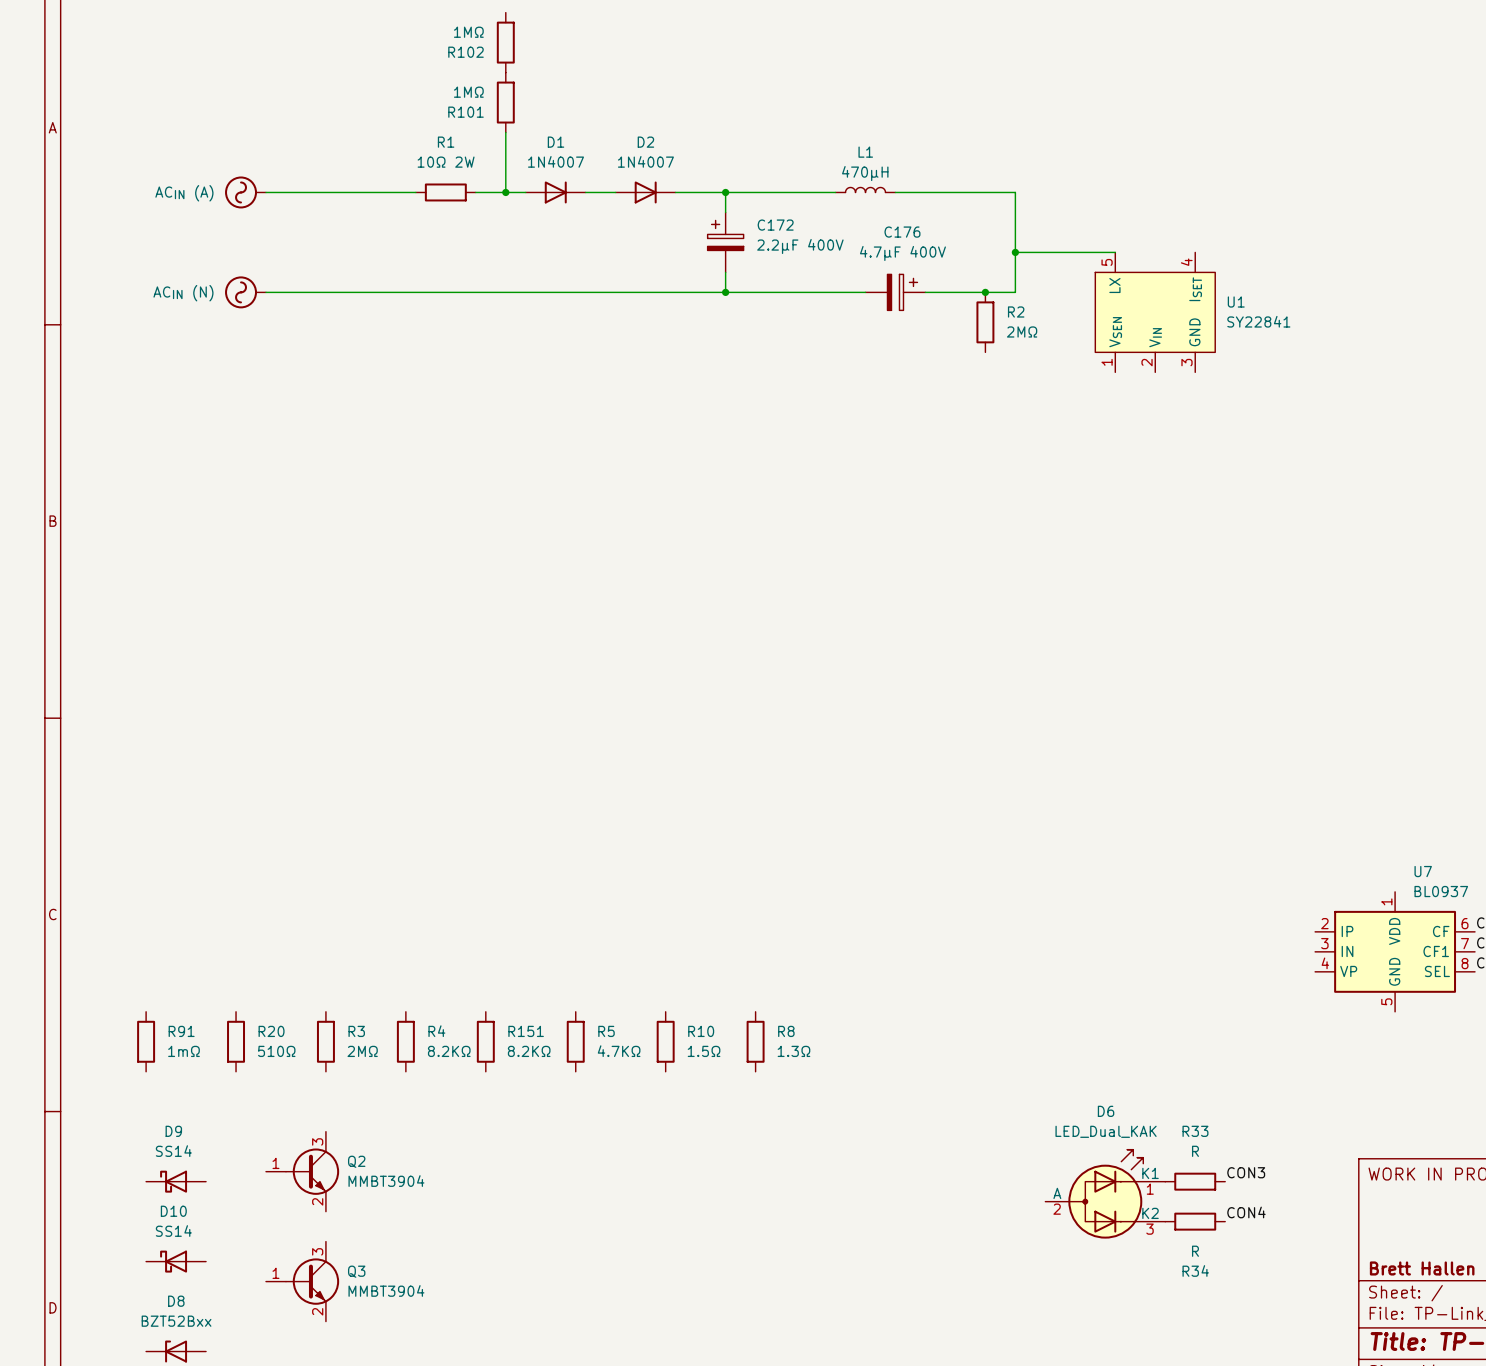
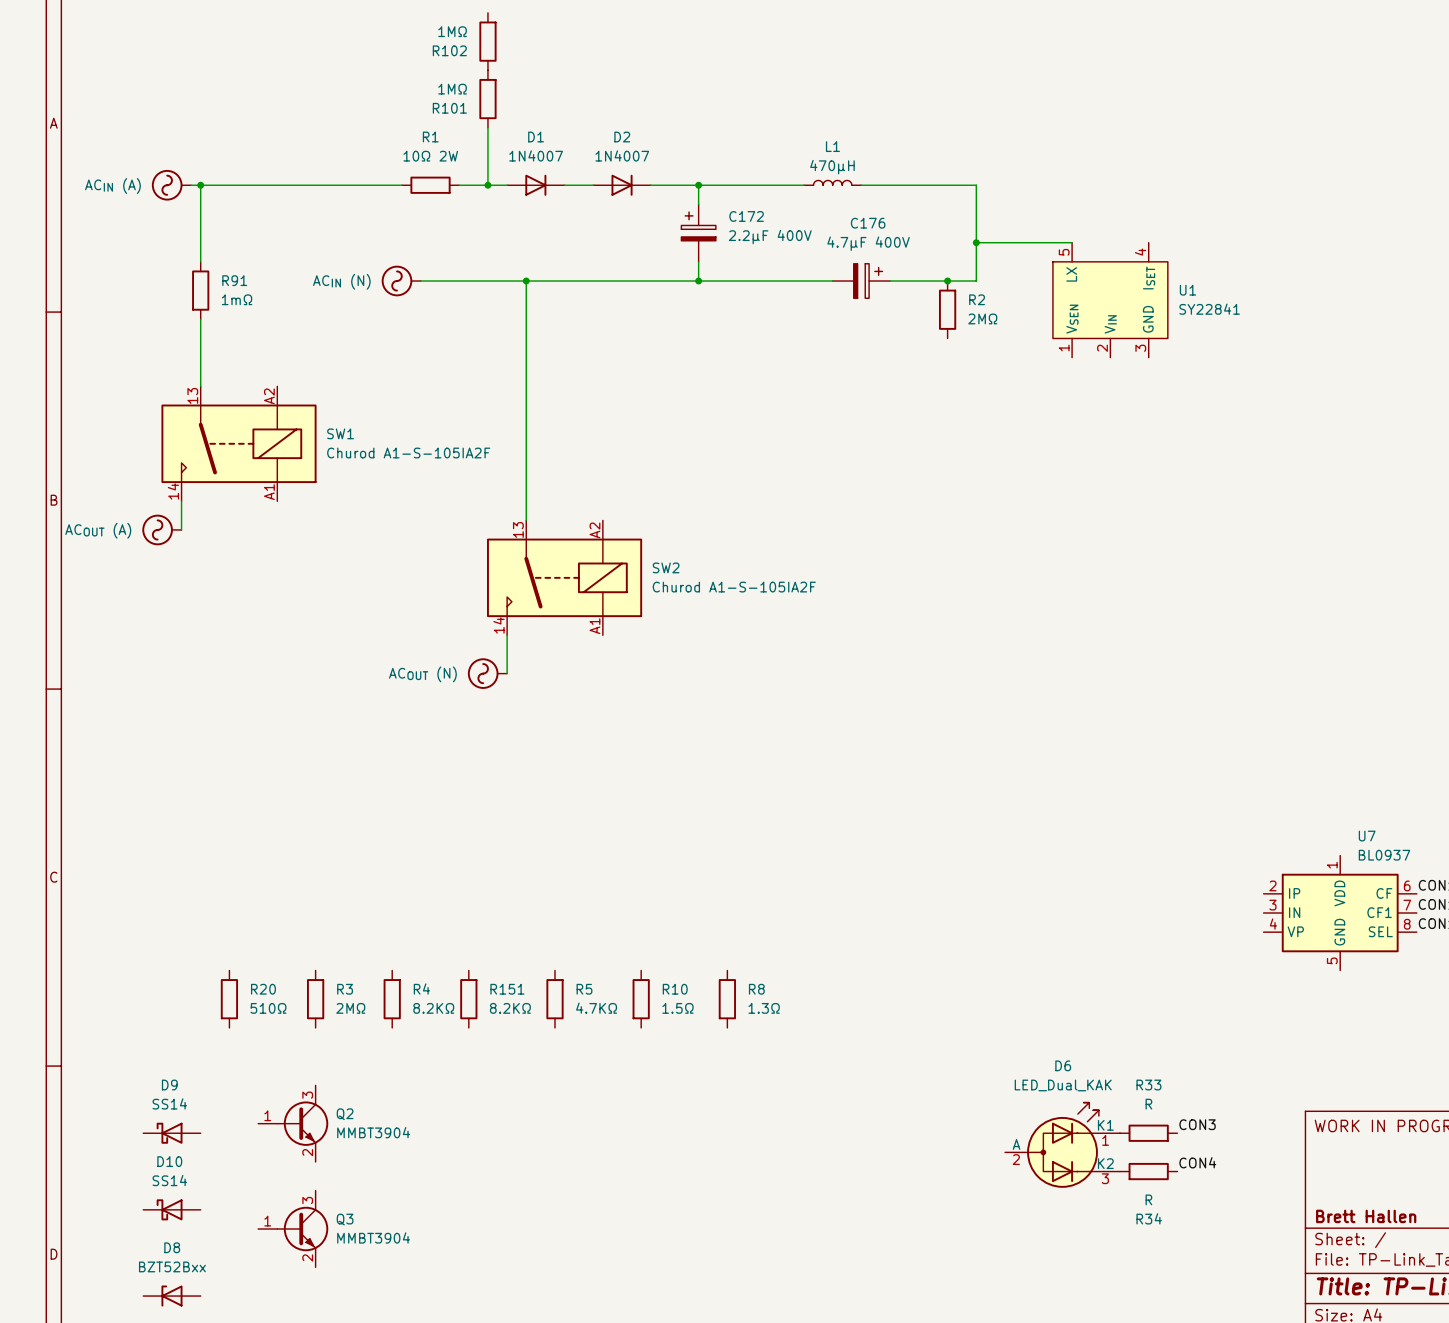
wire: none -> (191, 185) (258, 185)
wire: none -> (200, 185) (200, 261)
junction: none -> (200, 185)
power symbol position: ACIN (A) (245, 192) -> ACIN (A) (171, 185)
power symbol position: ACIN (N) (245, 292) -> ACIN (N) (401, 281)
wire: (265, 292) (435, 292) -> none
wire: none -> (526, 281) (526, 520)
junction: none -> (526, 281)
wire: none -> (200, 319) (200, 386)
SW1: none -> Churod A1-S-105IA2F (239, 443)
wire: none -> (181, 501) (181, 529)
power symbol: none -> ACOUT (A) (161, 529)
SW2: none -> Churod A1-S-105IA2F (564, 577)
wire: none -> (507, 635) (507, 673)
power symbol: none -> ACOUT (N) (487, 673)
R91 position: (146, 1041) -> (200, 290)

